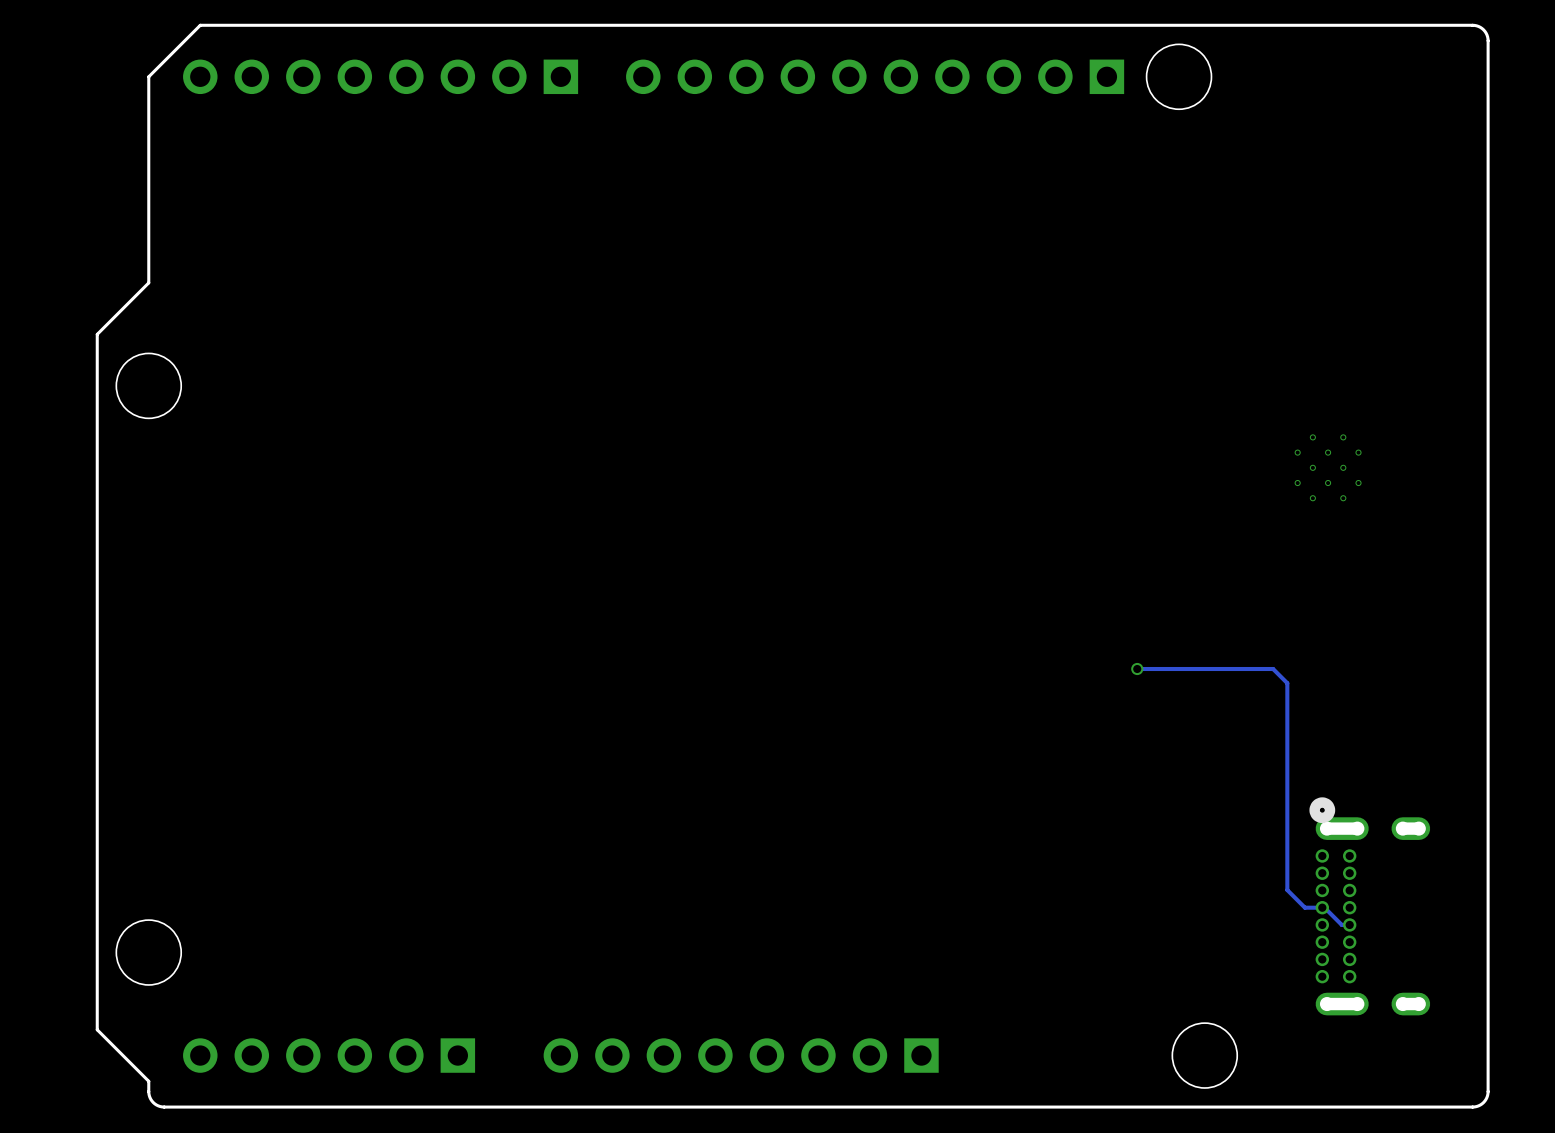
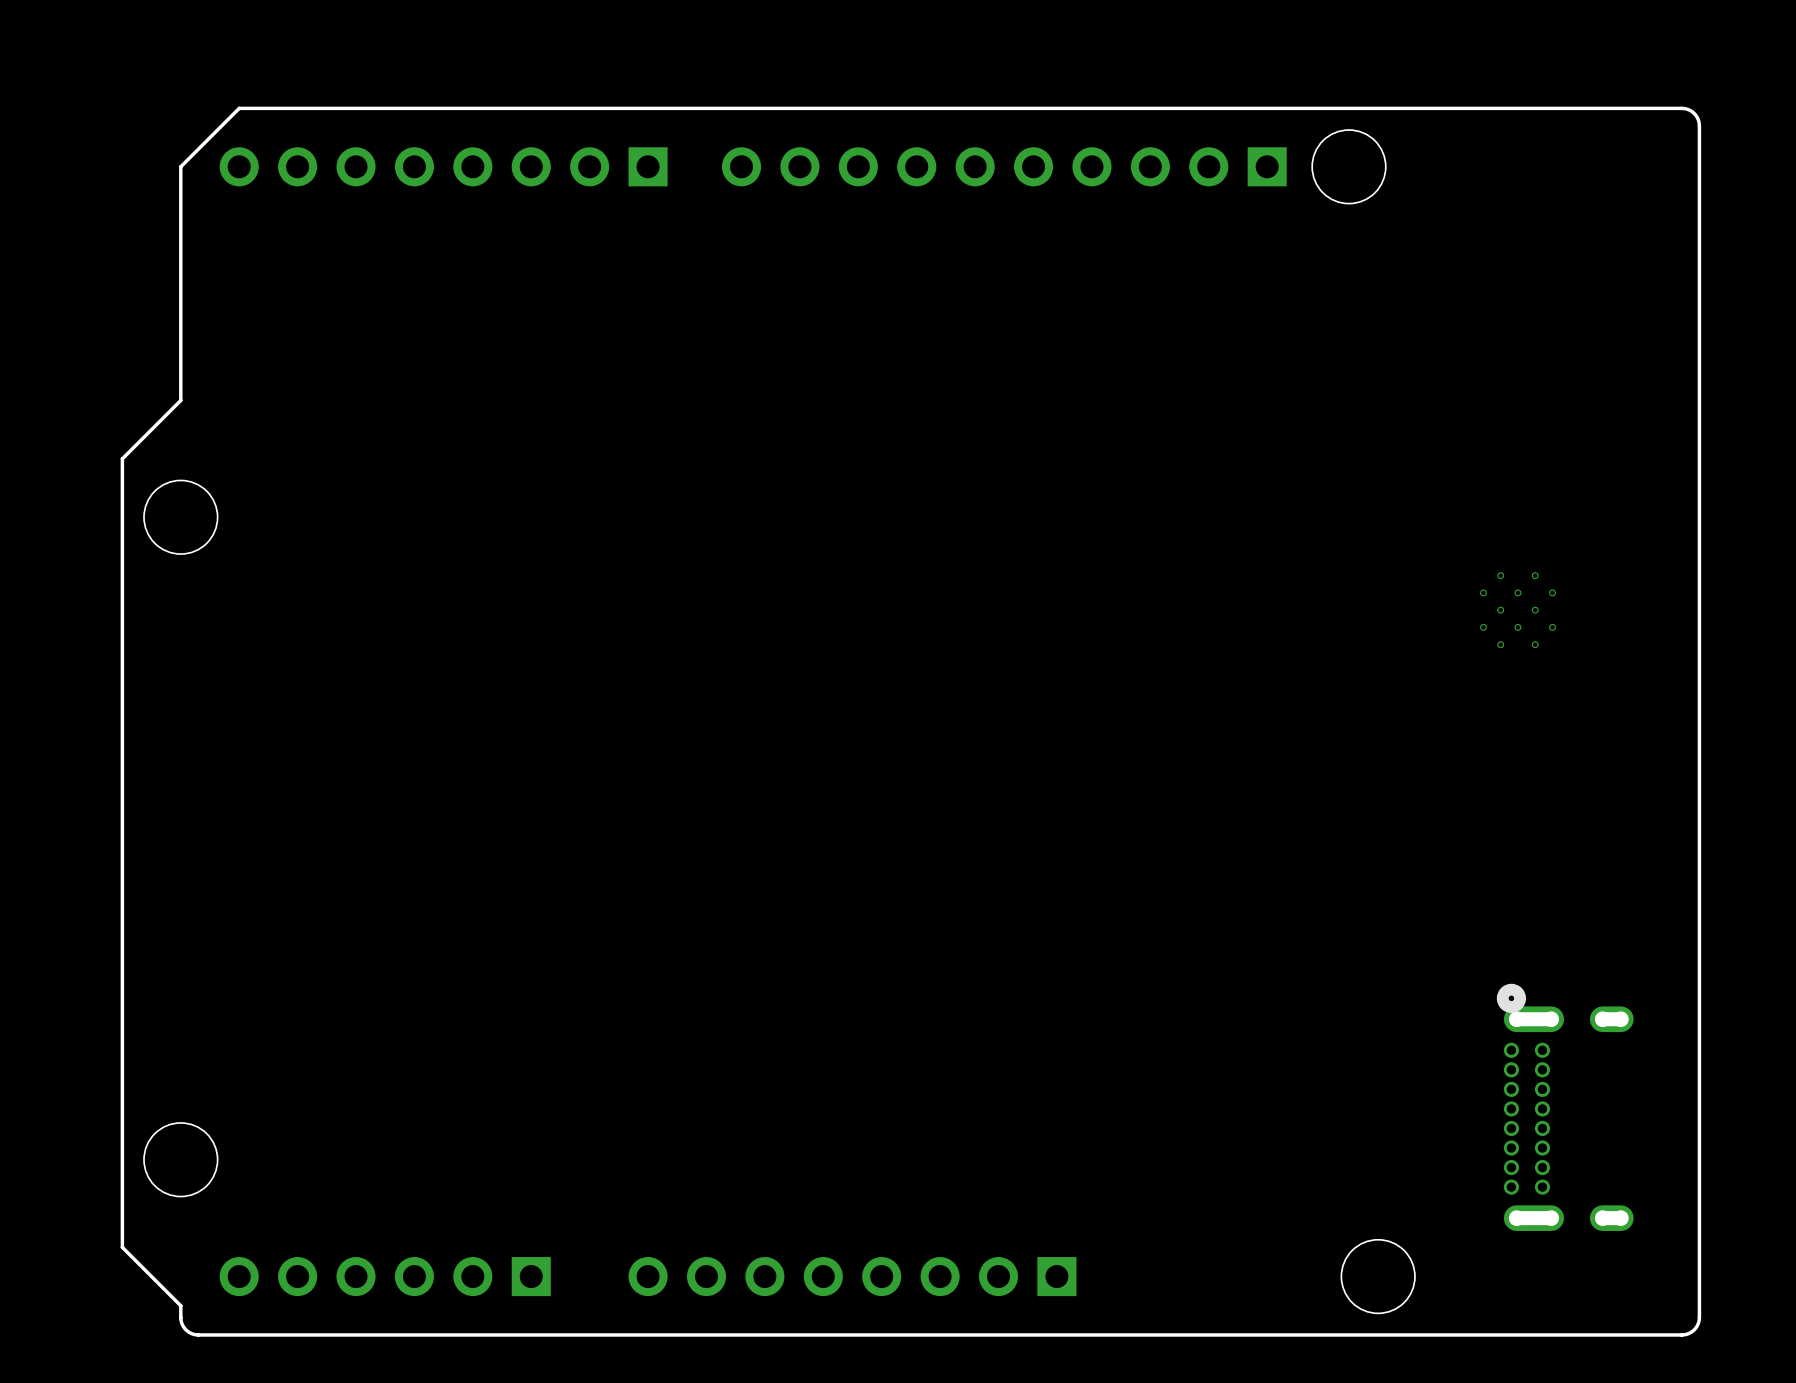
track: (1137, 669) (1273, 669) (1287, 683) (1287, 890) (1304, 907) (1324, 907) (1341, 924) (1349, 924) -> none
via: (1137, 669) -> none

